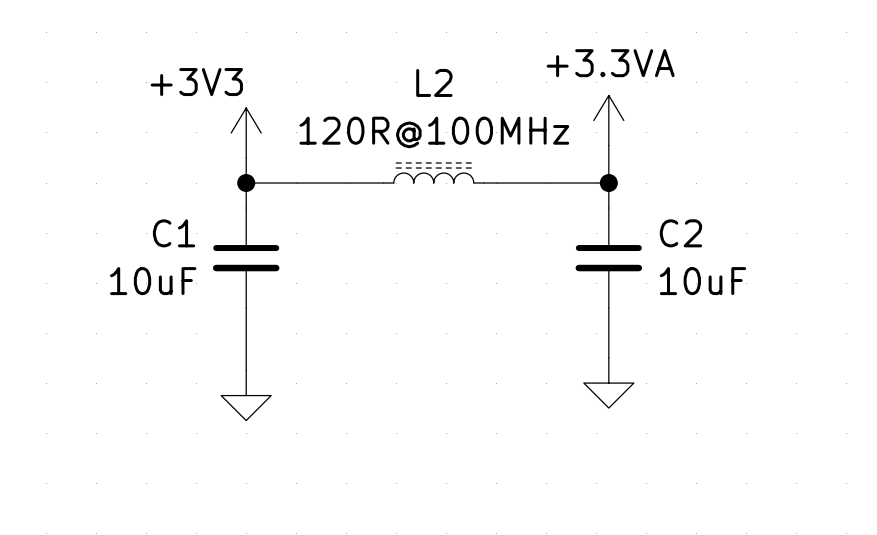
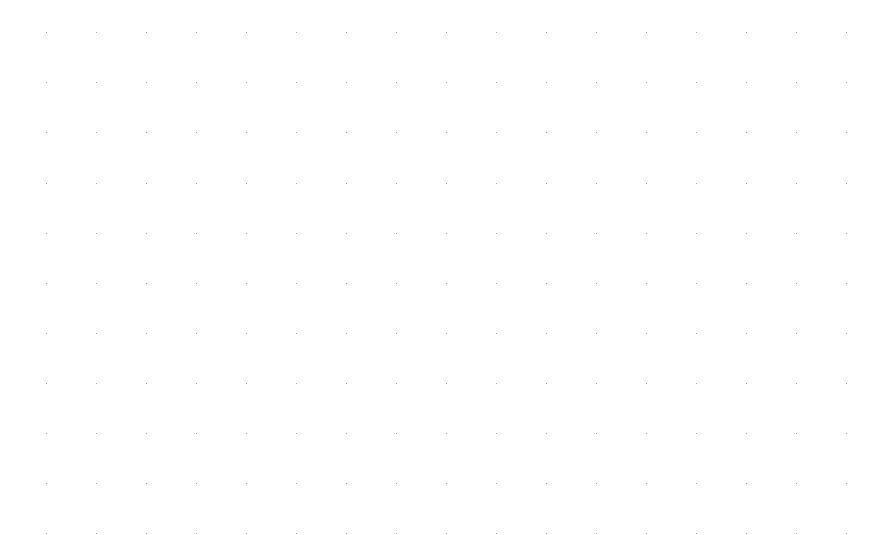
power symbol: +3.3VA (608, 120) -> none
power symbol: +3V3 (246, 132) -> none
wire: (608, 145) (608, 208) -> none
wire: (246, 158) (246, 208) -> none
L2: 120R@100MHz (433, 173) -> none
wire: (246, 183) (383, 183) -> none
junction: (246, 183) -> none
wire: (483, 183) (608, 183) -> none
junction: (608, 183) -> none
C1: 10uF (246, 258) -> none
C2: 10uF (608, 258) -> none
wire: (246, 308) (246, 370) -> none
wire: (608, 308) (608, 358) -> none
power symbol: (608, 383) -> none
power symbol: (246, 395) -> none

